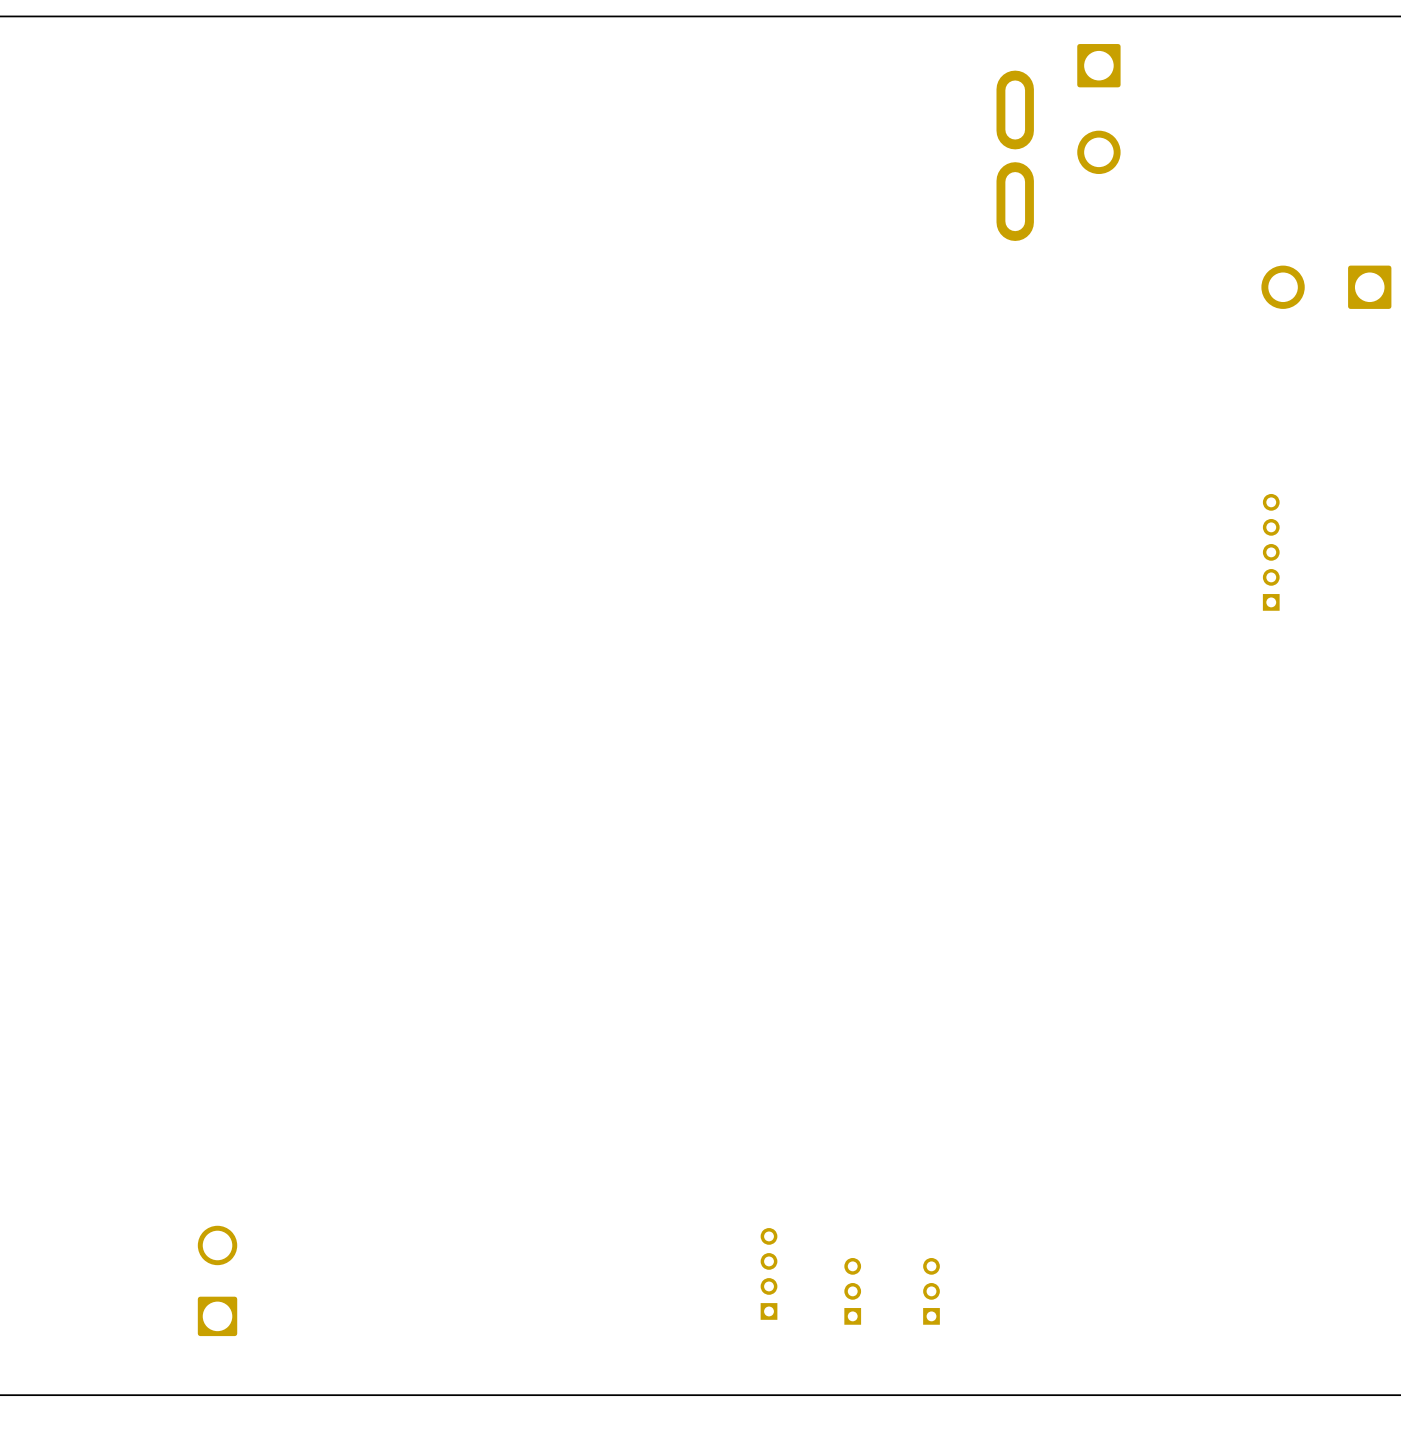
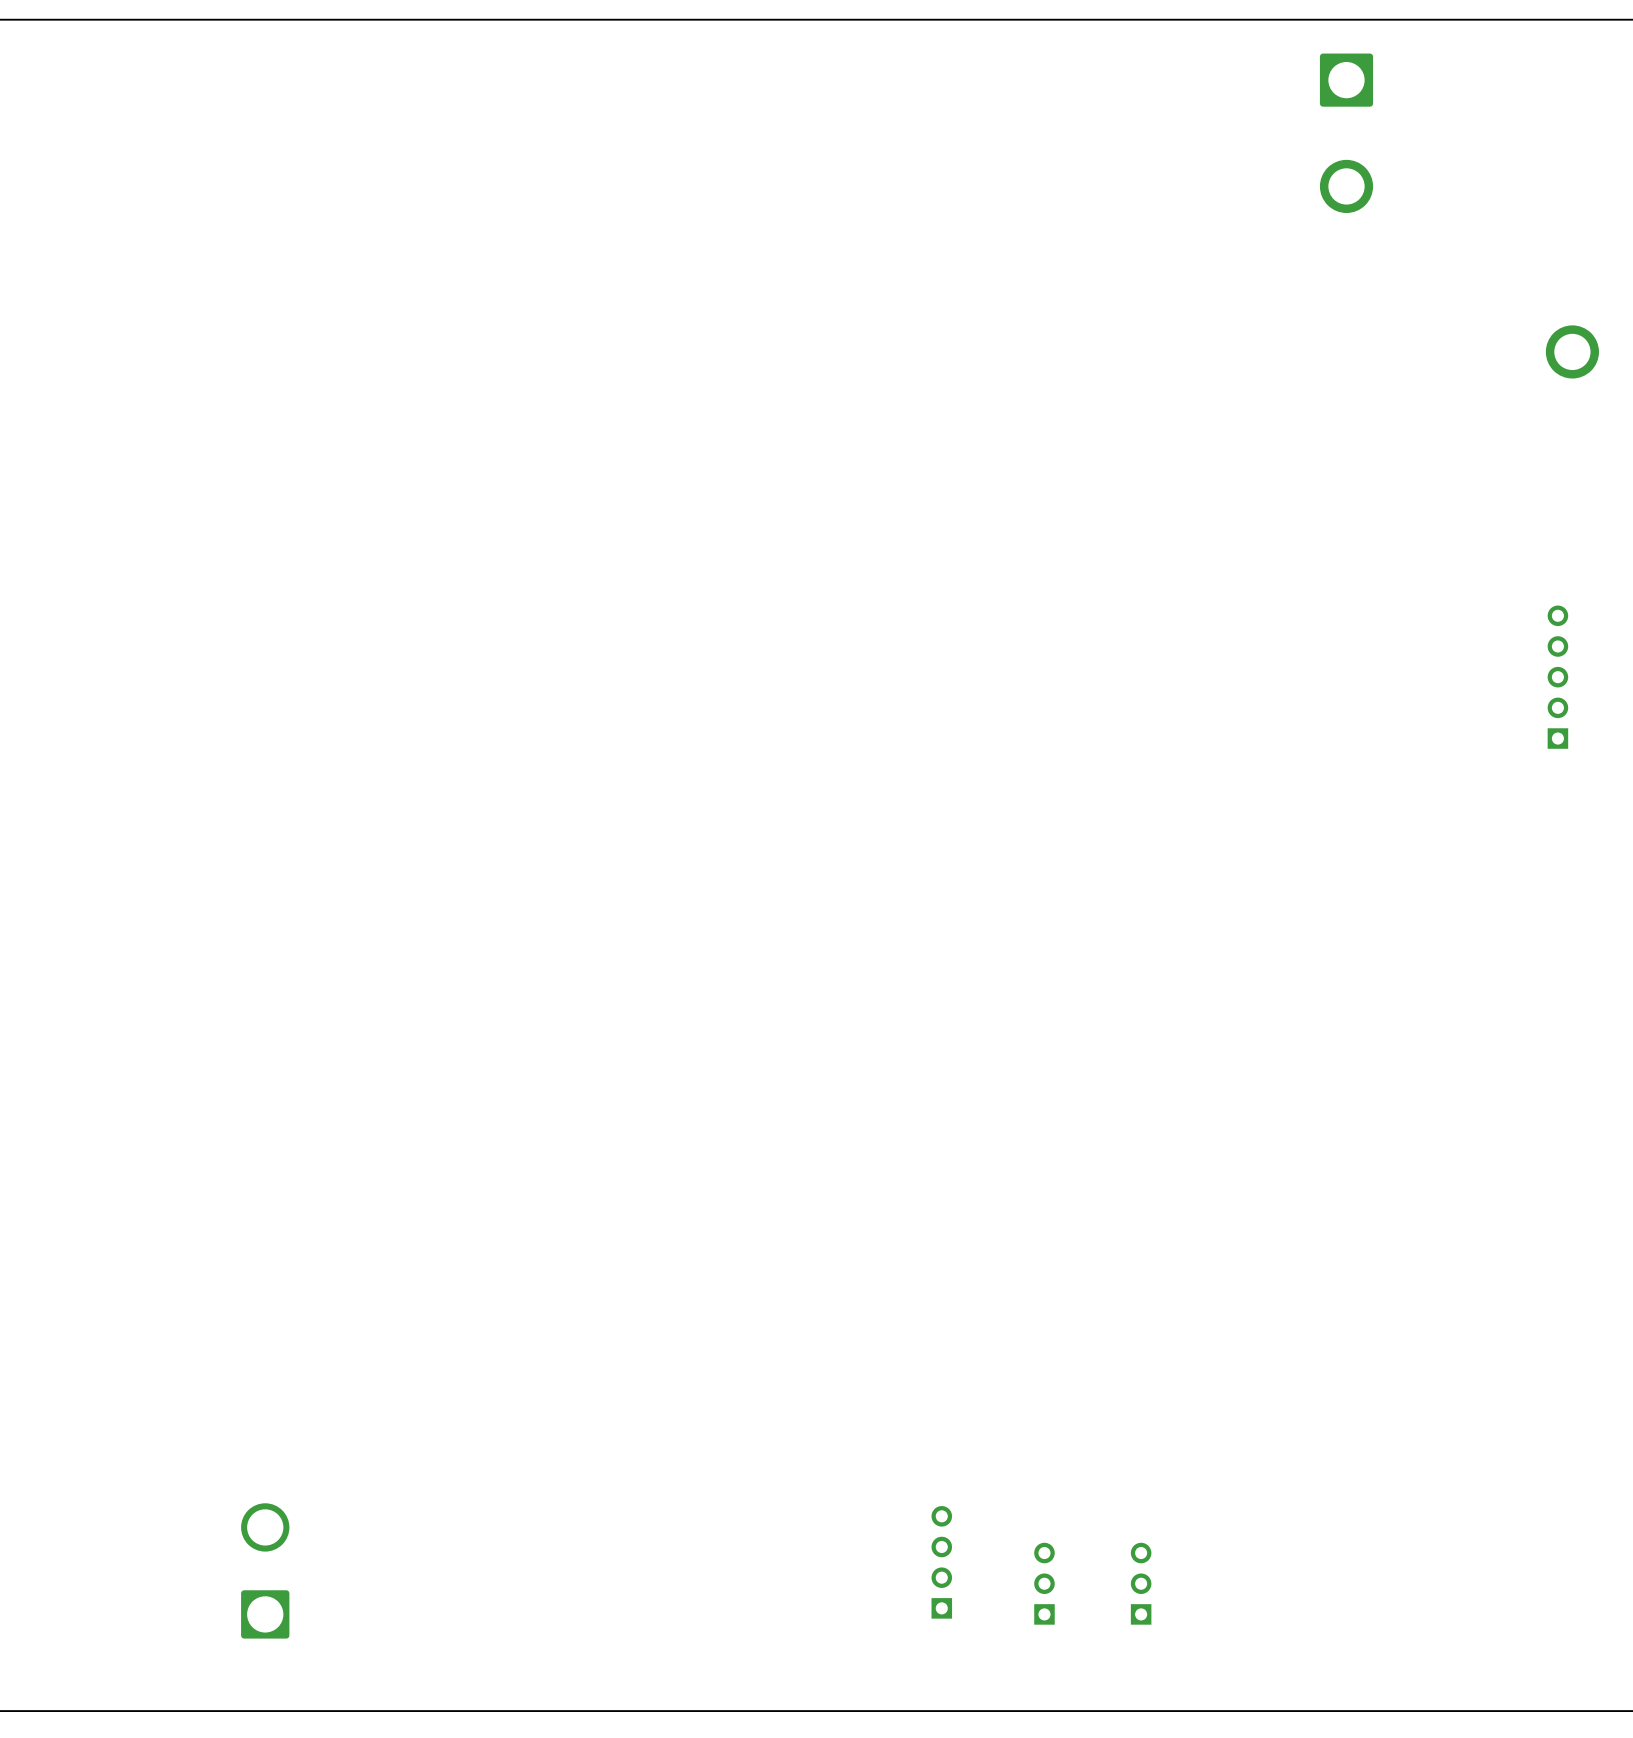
part: (1015, 155) -> none

